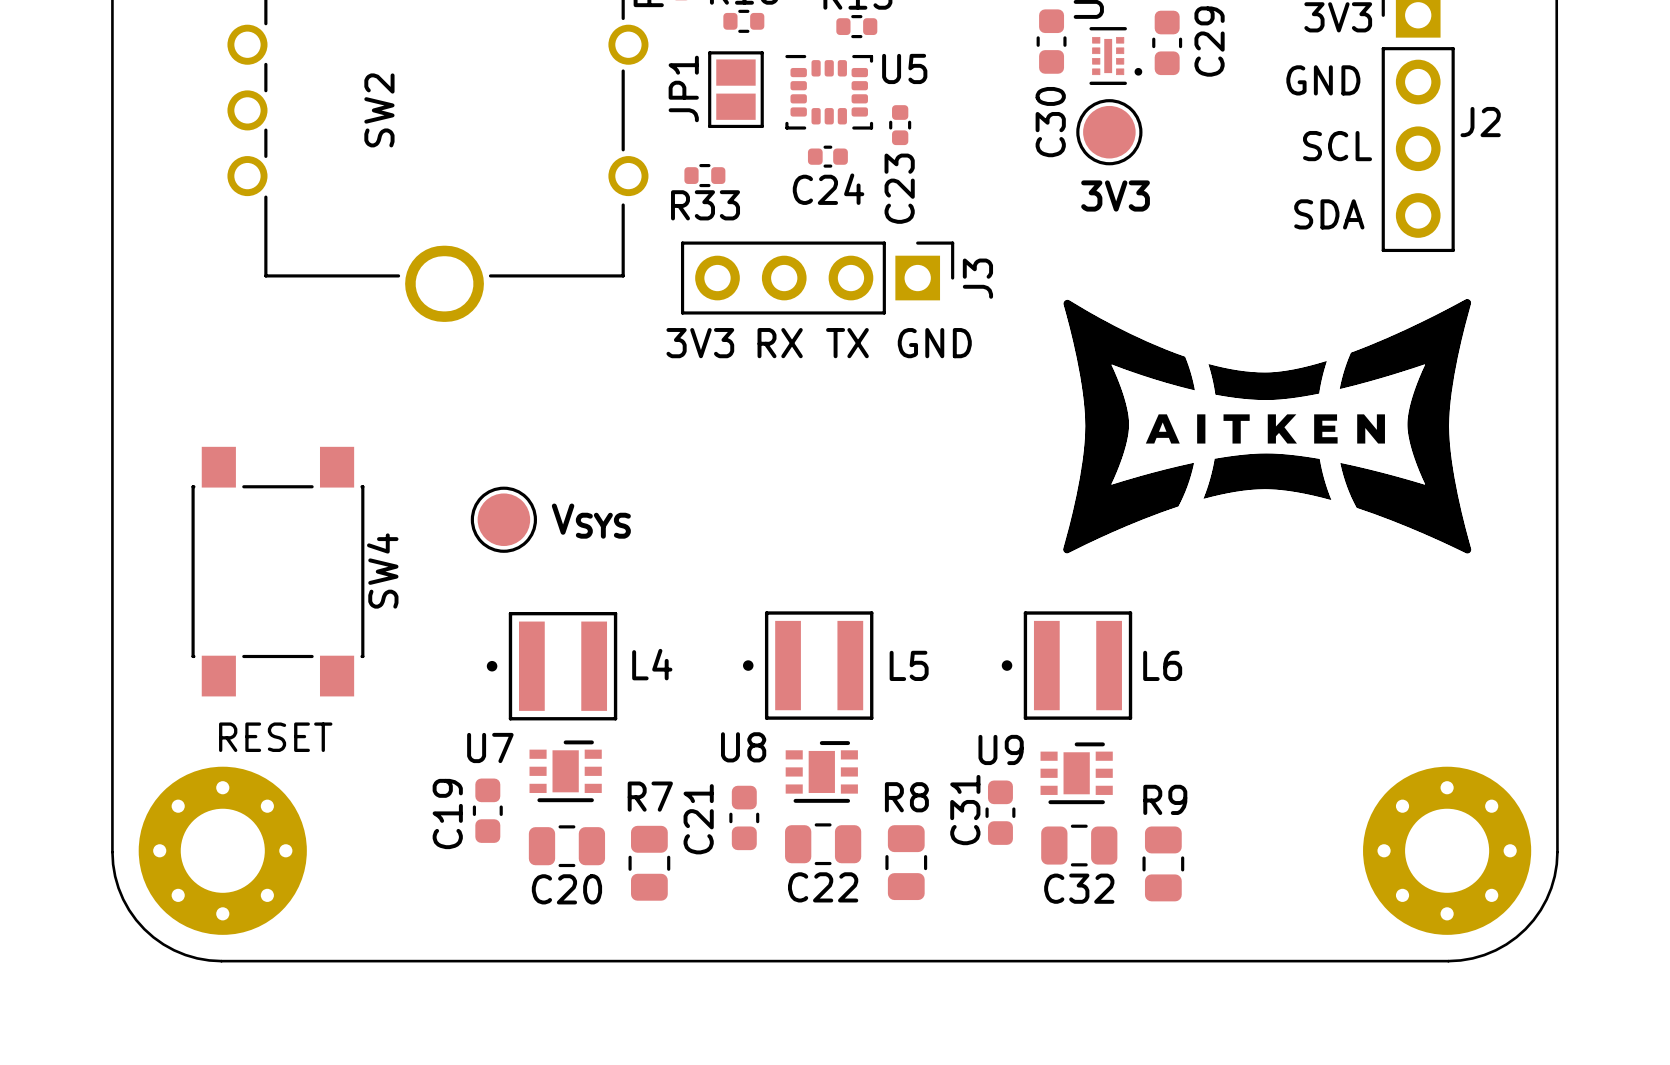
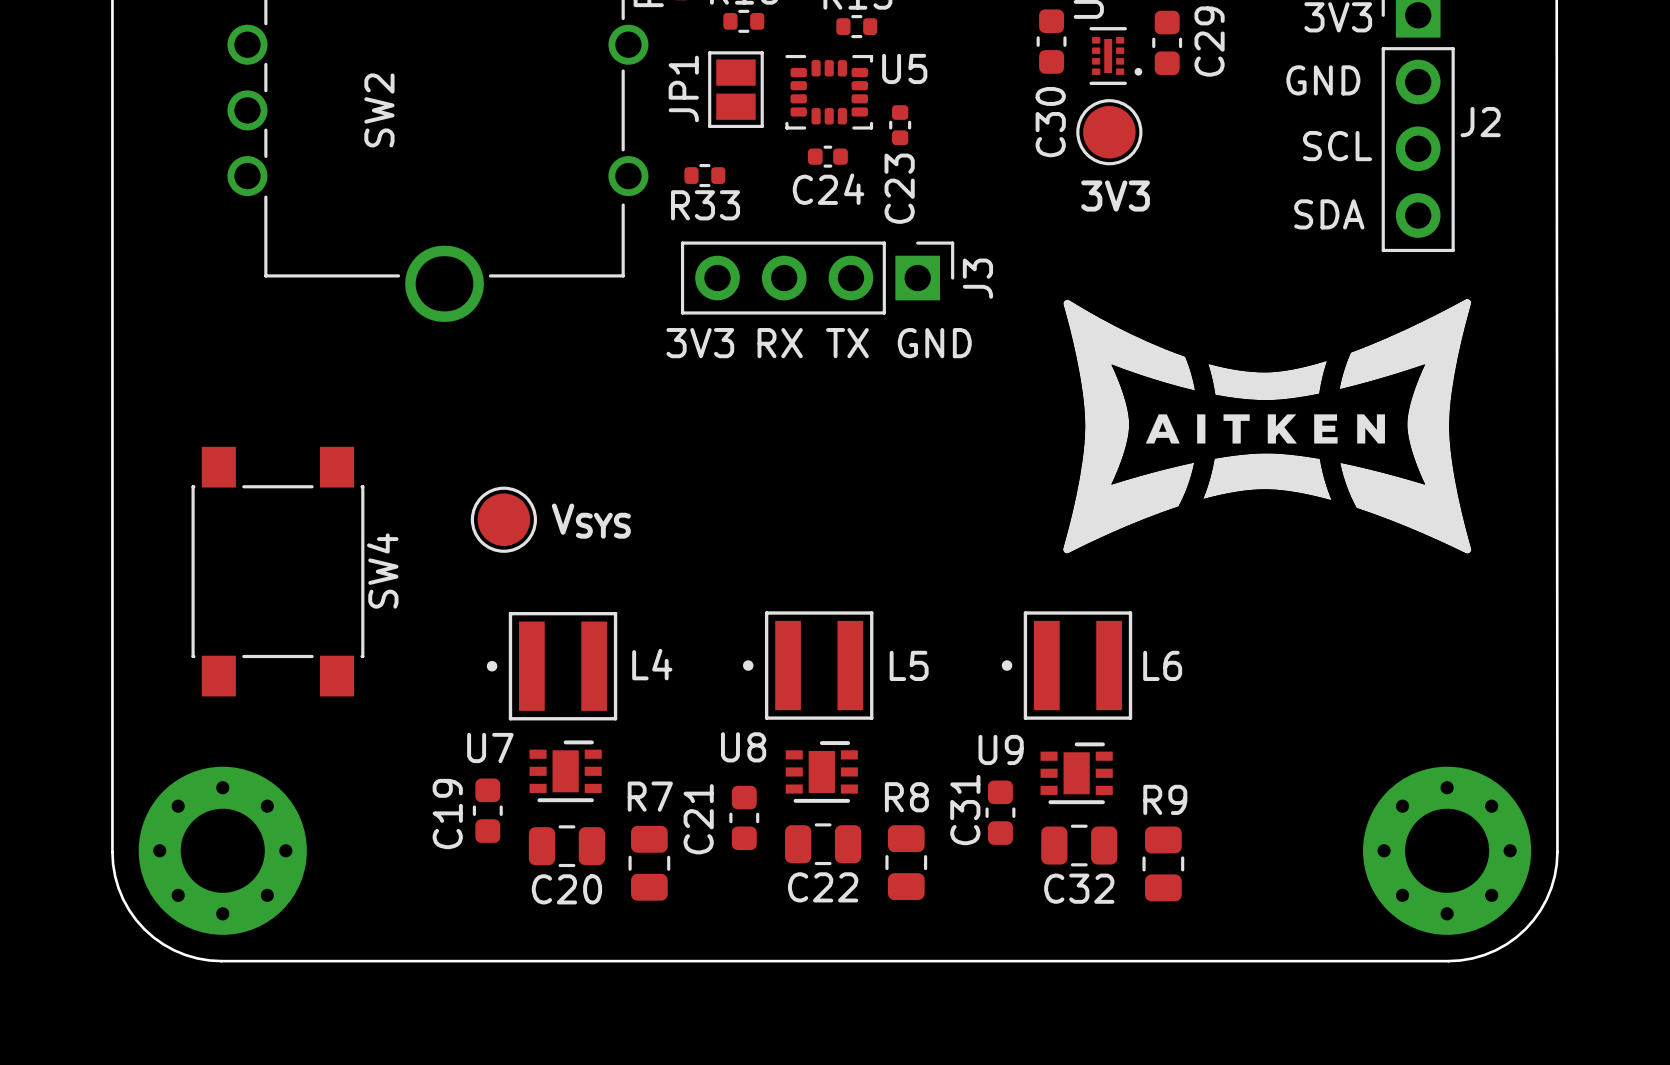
text: RESET (275, 737) -> none

